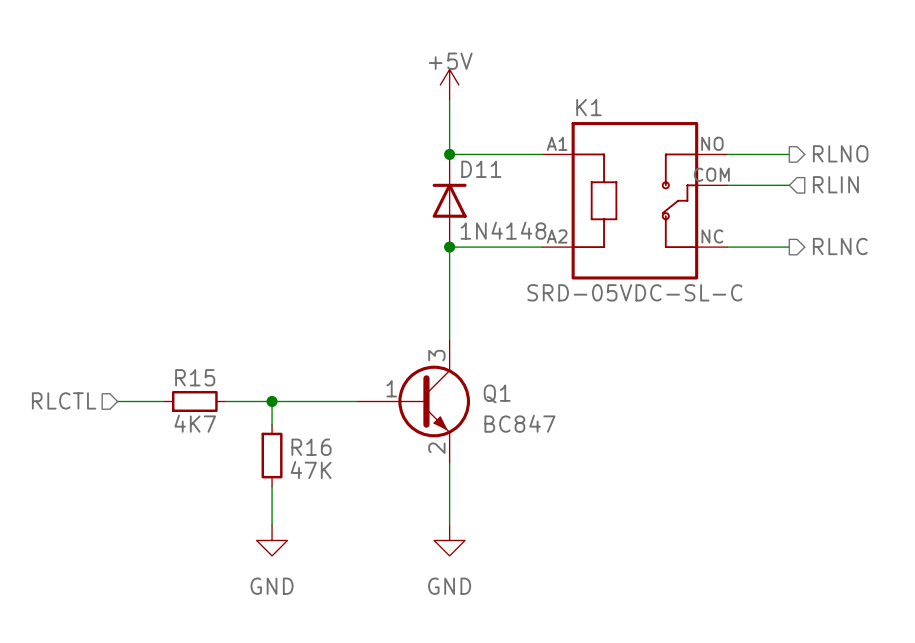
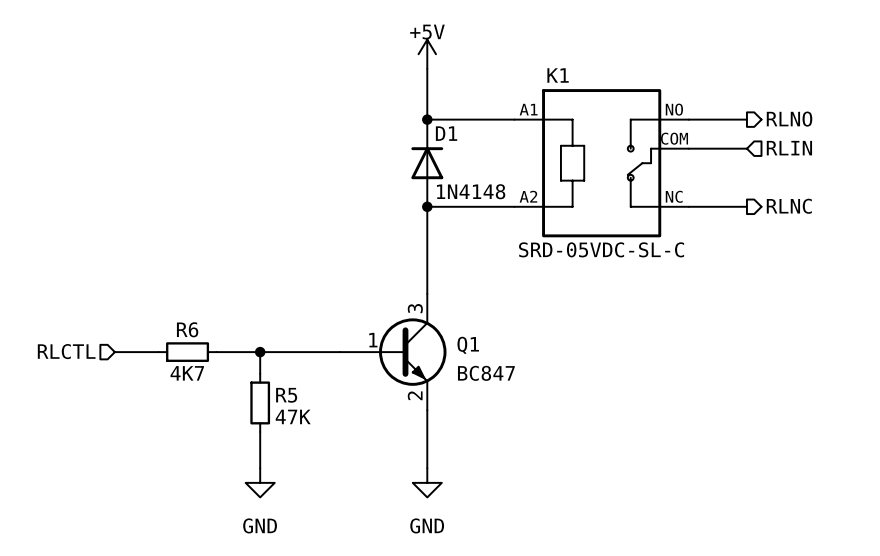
D11 name: D11 (481, 169) -> D1 (446, 133)
R15 name: R15 (195, 377) -> R6 (187, 329)
R16 name: R16 (311, 447) -> R5 (286, 395)

